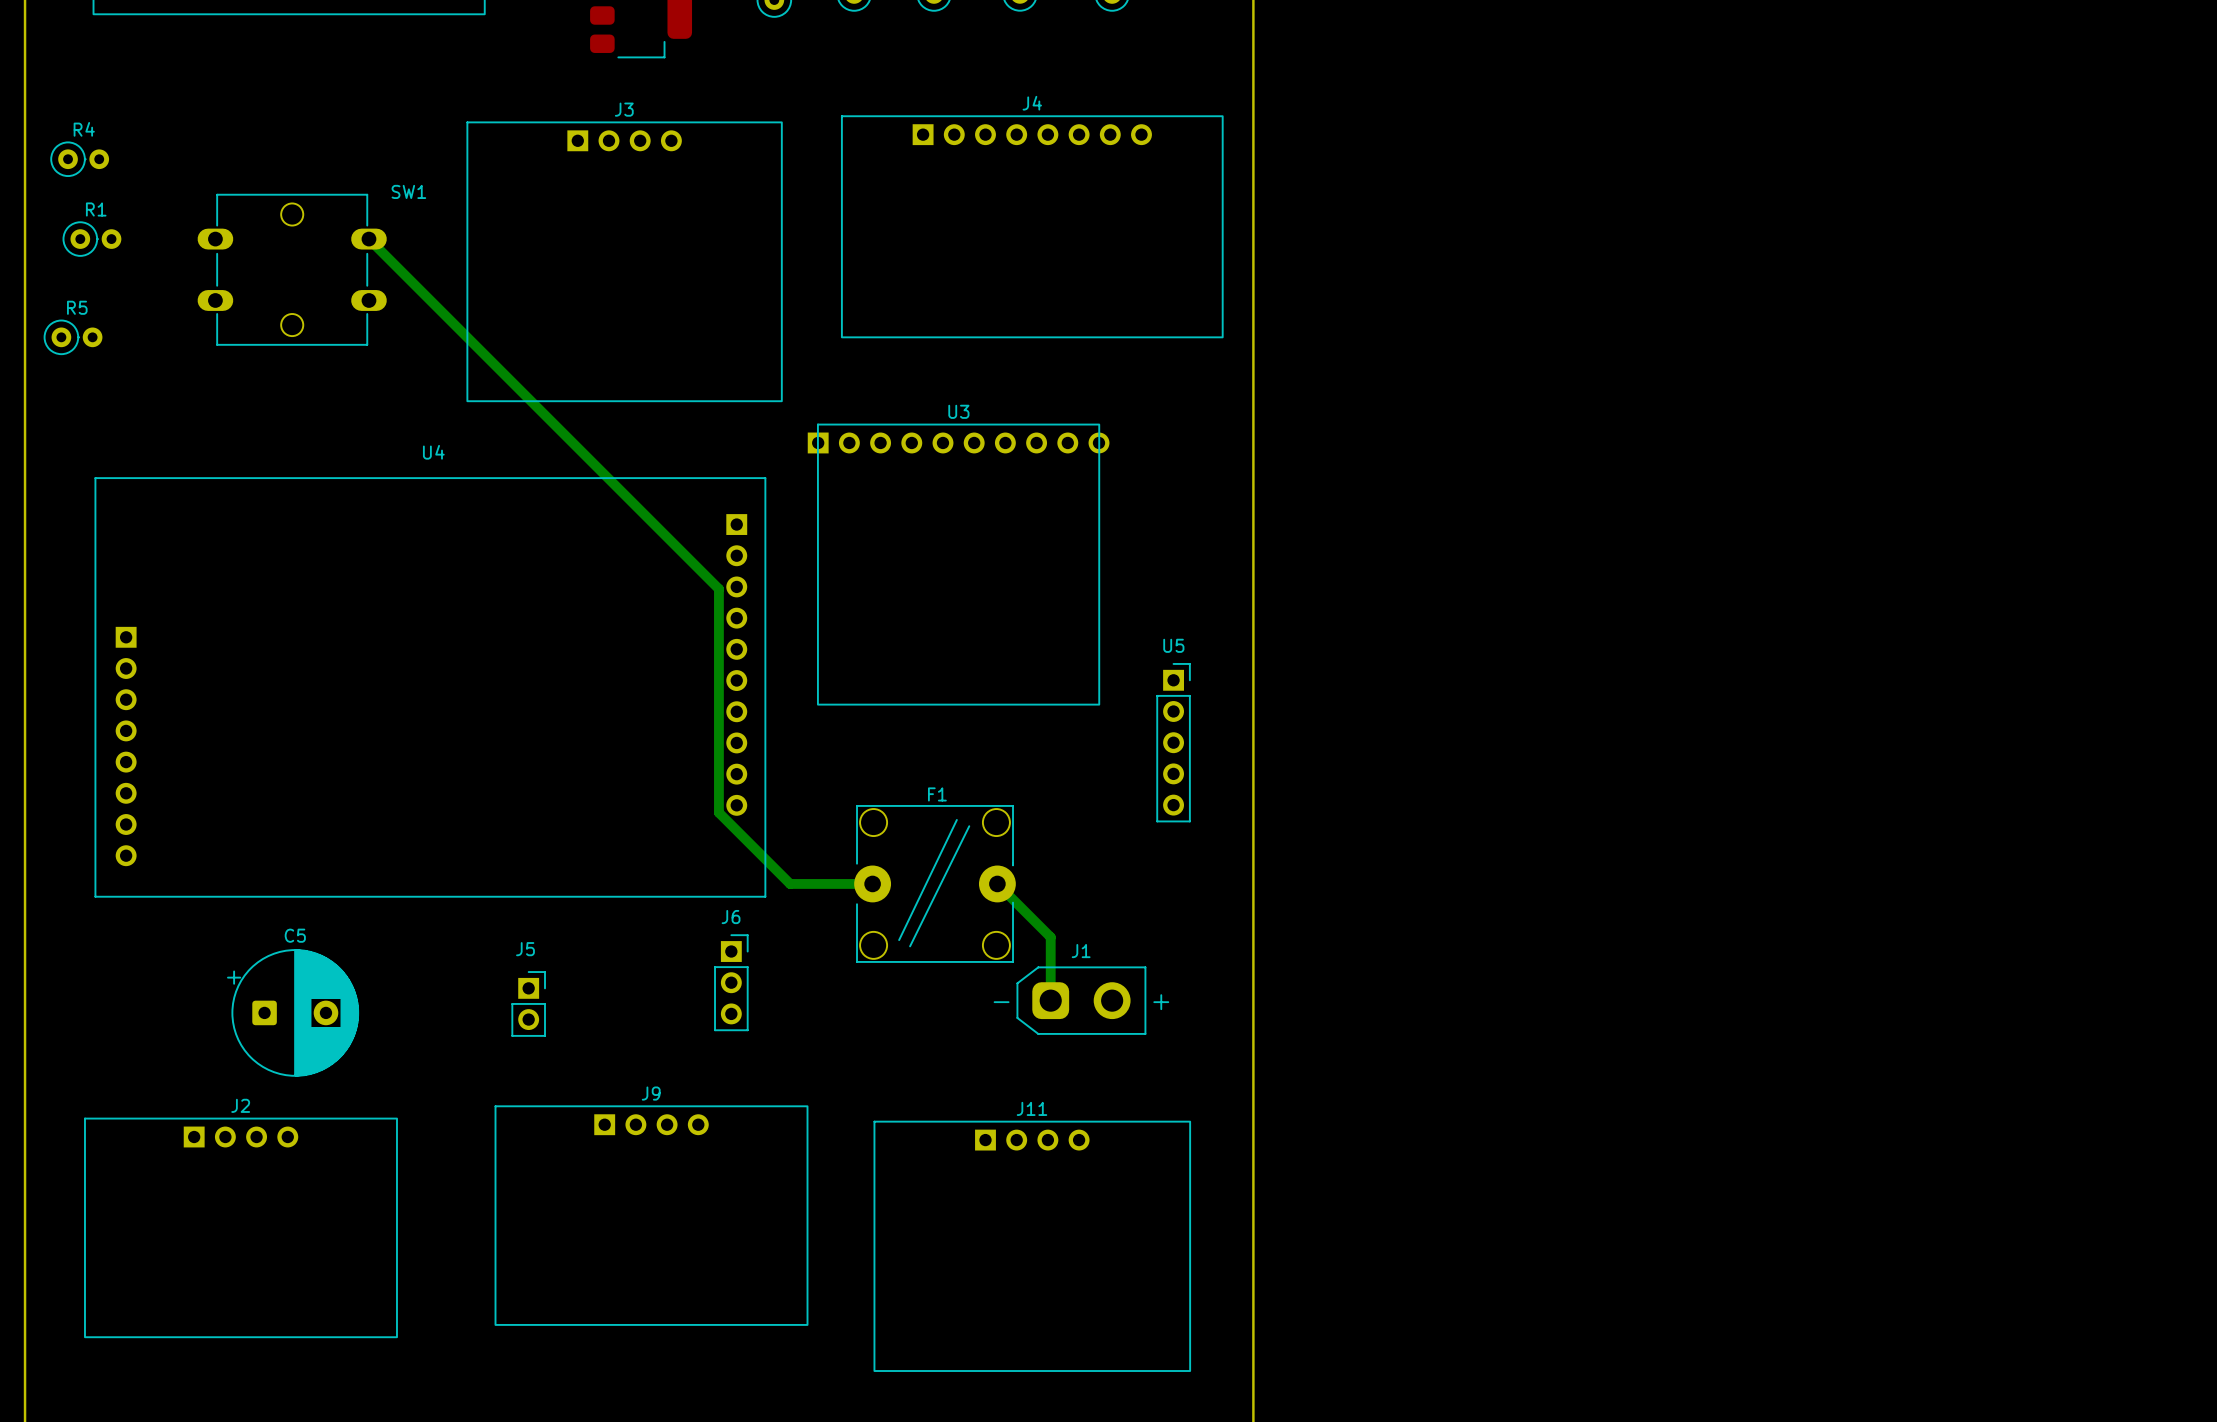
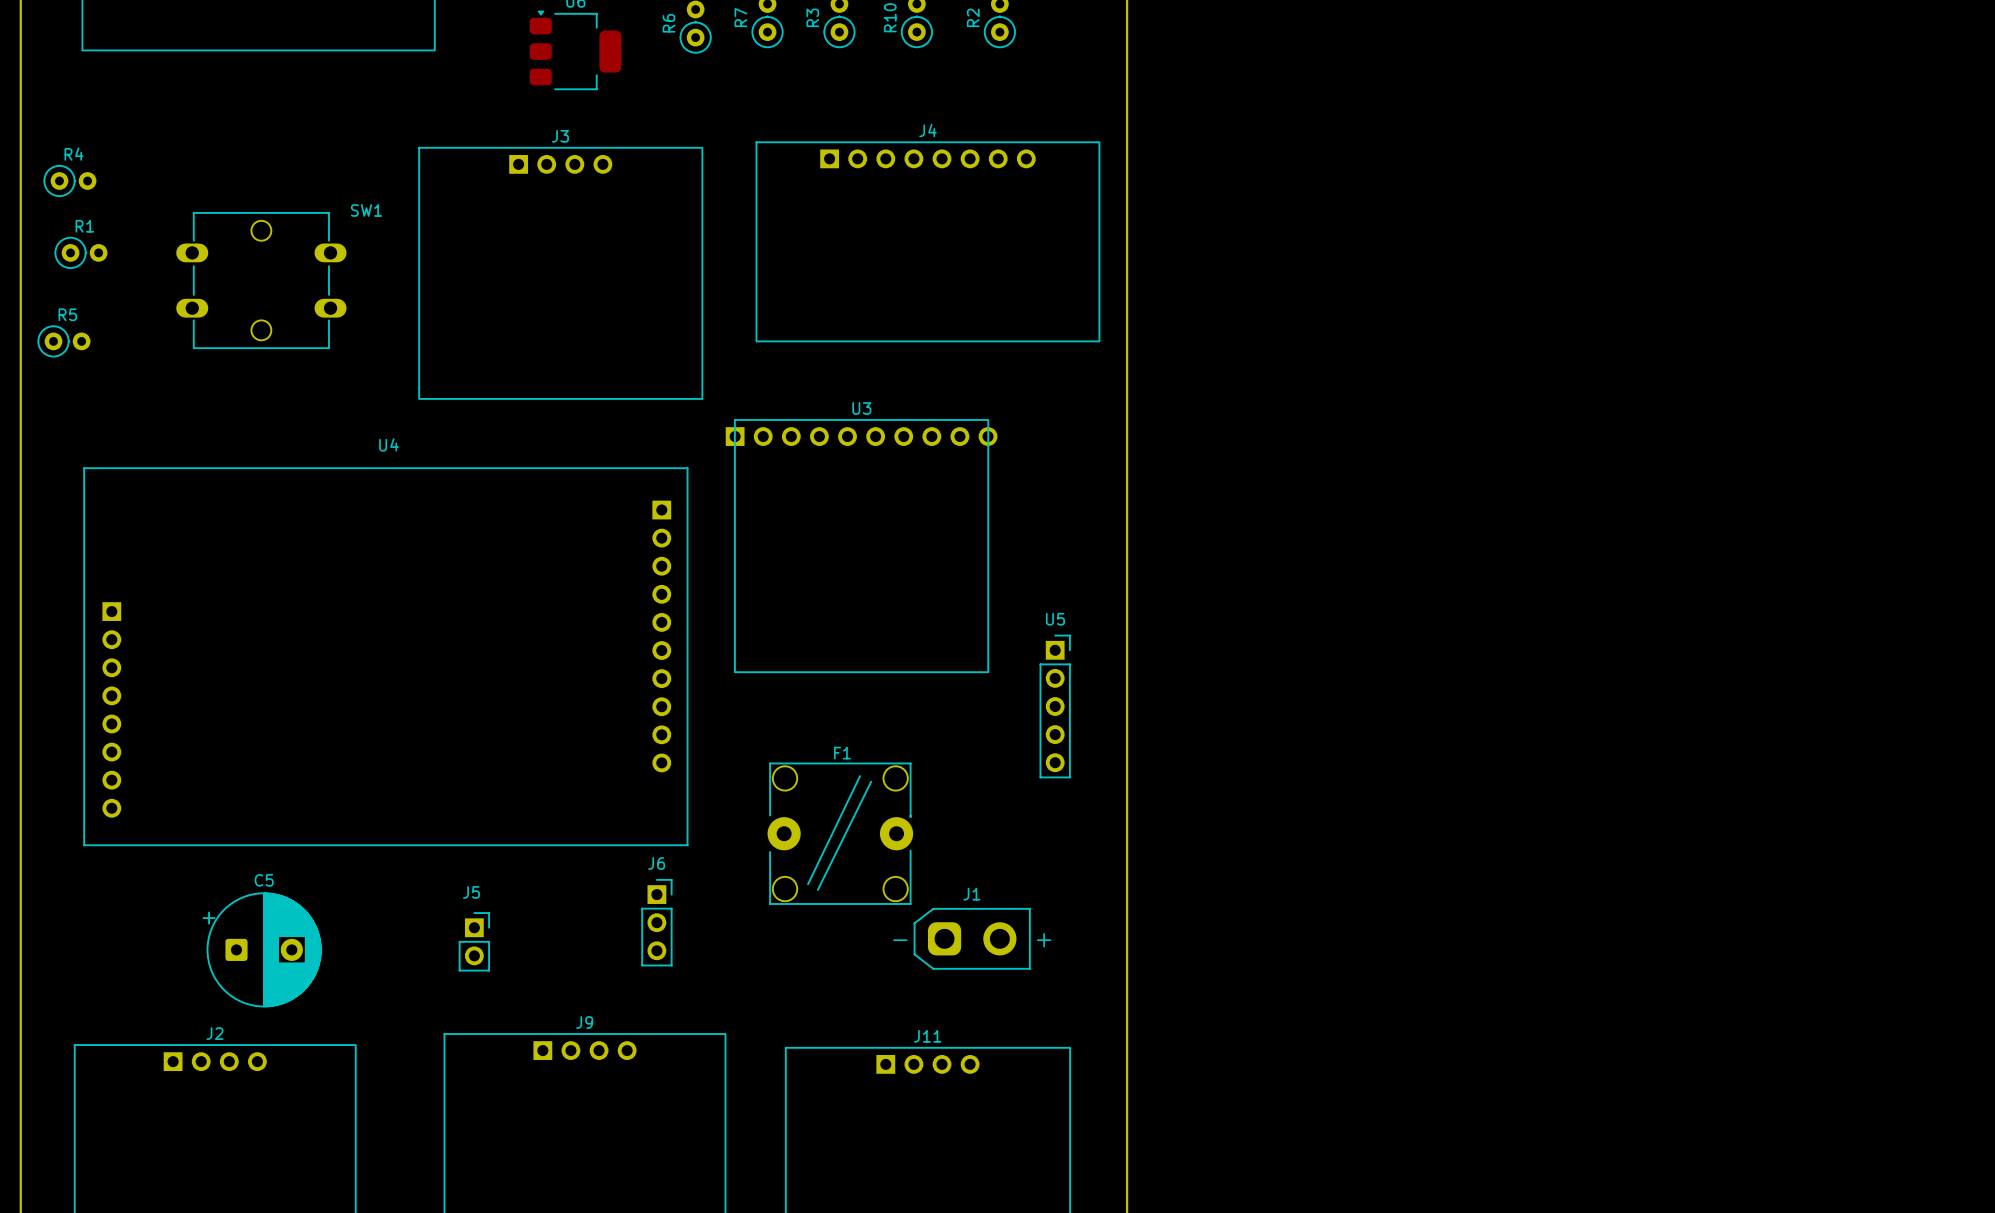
bottom track: (368, 239) (718, 589) (718, 812) (790, 883) (872, 883) -> none
bottom track: (997, 883) (1050, 937) (1050, 1000) -> none

